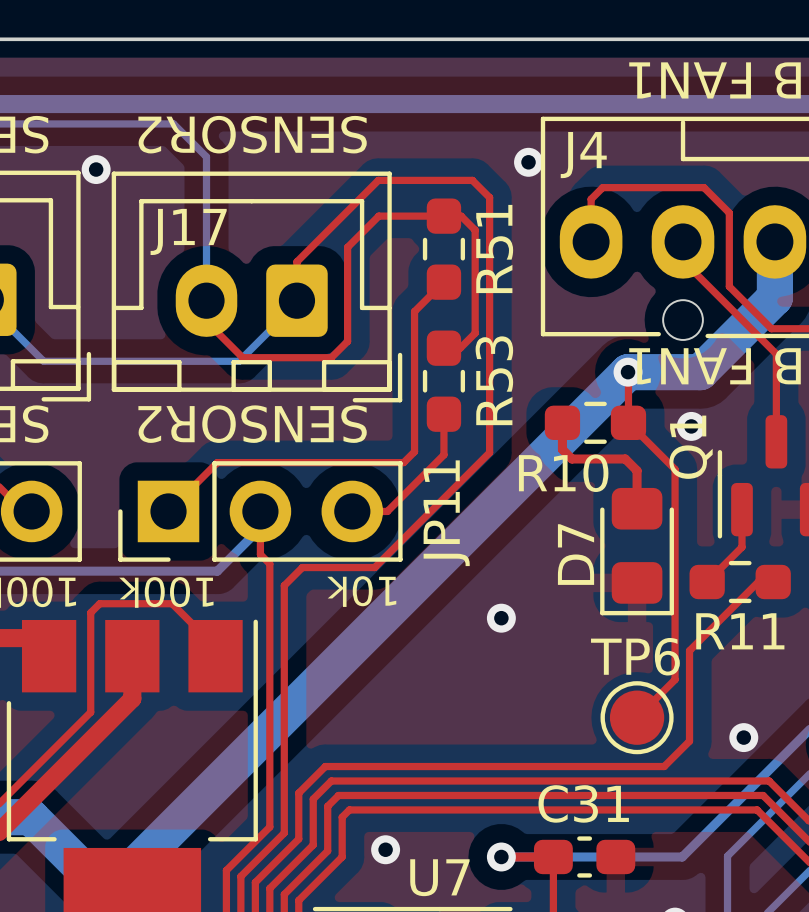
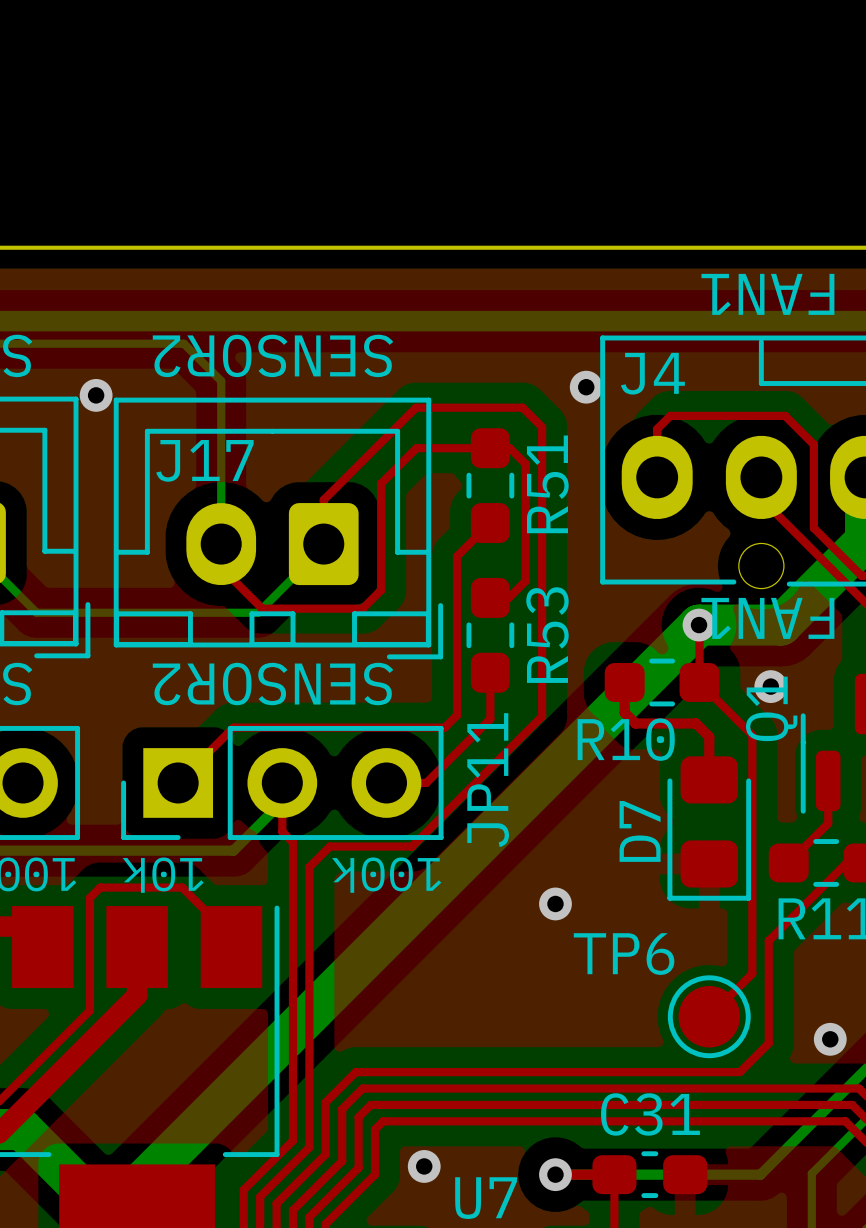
text: 10k (361, 591) -> 100k (386, 875)
text: 100k (166, 592) -> 10k (163, 875)
TP6 name position: TP6 (635, 656) -> TP6 (624, 954)

